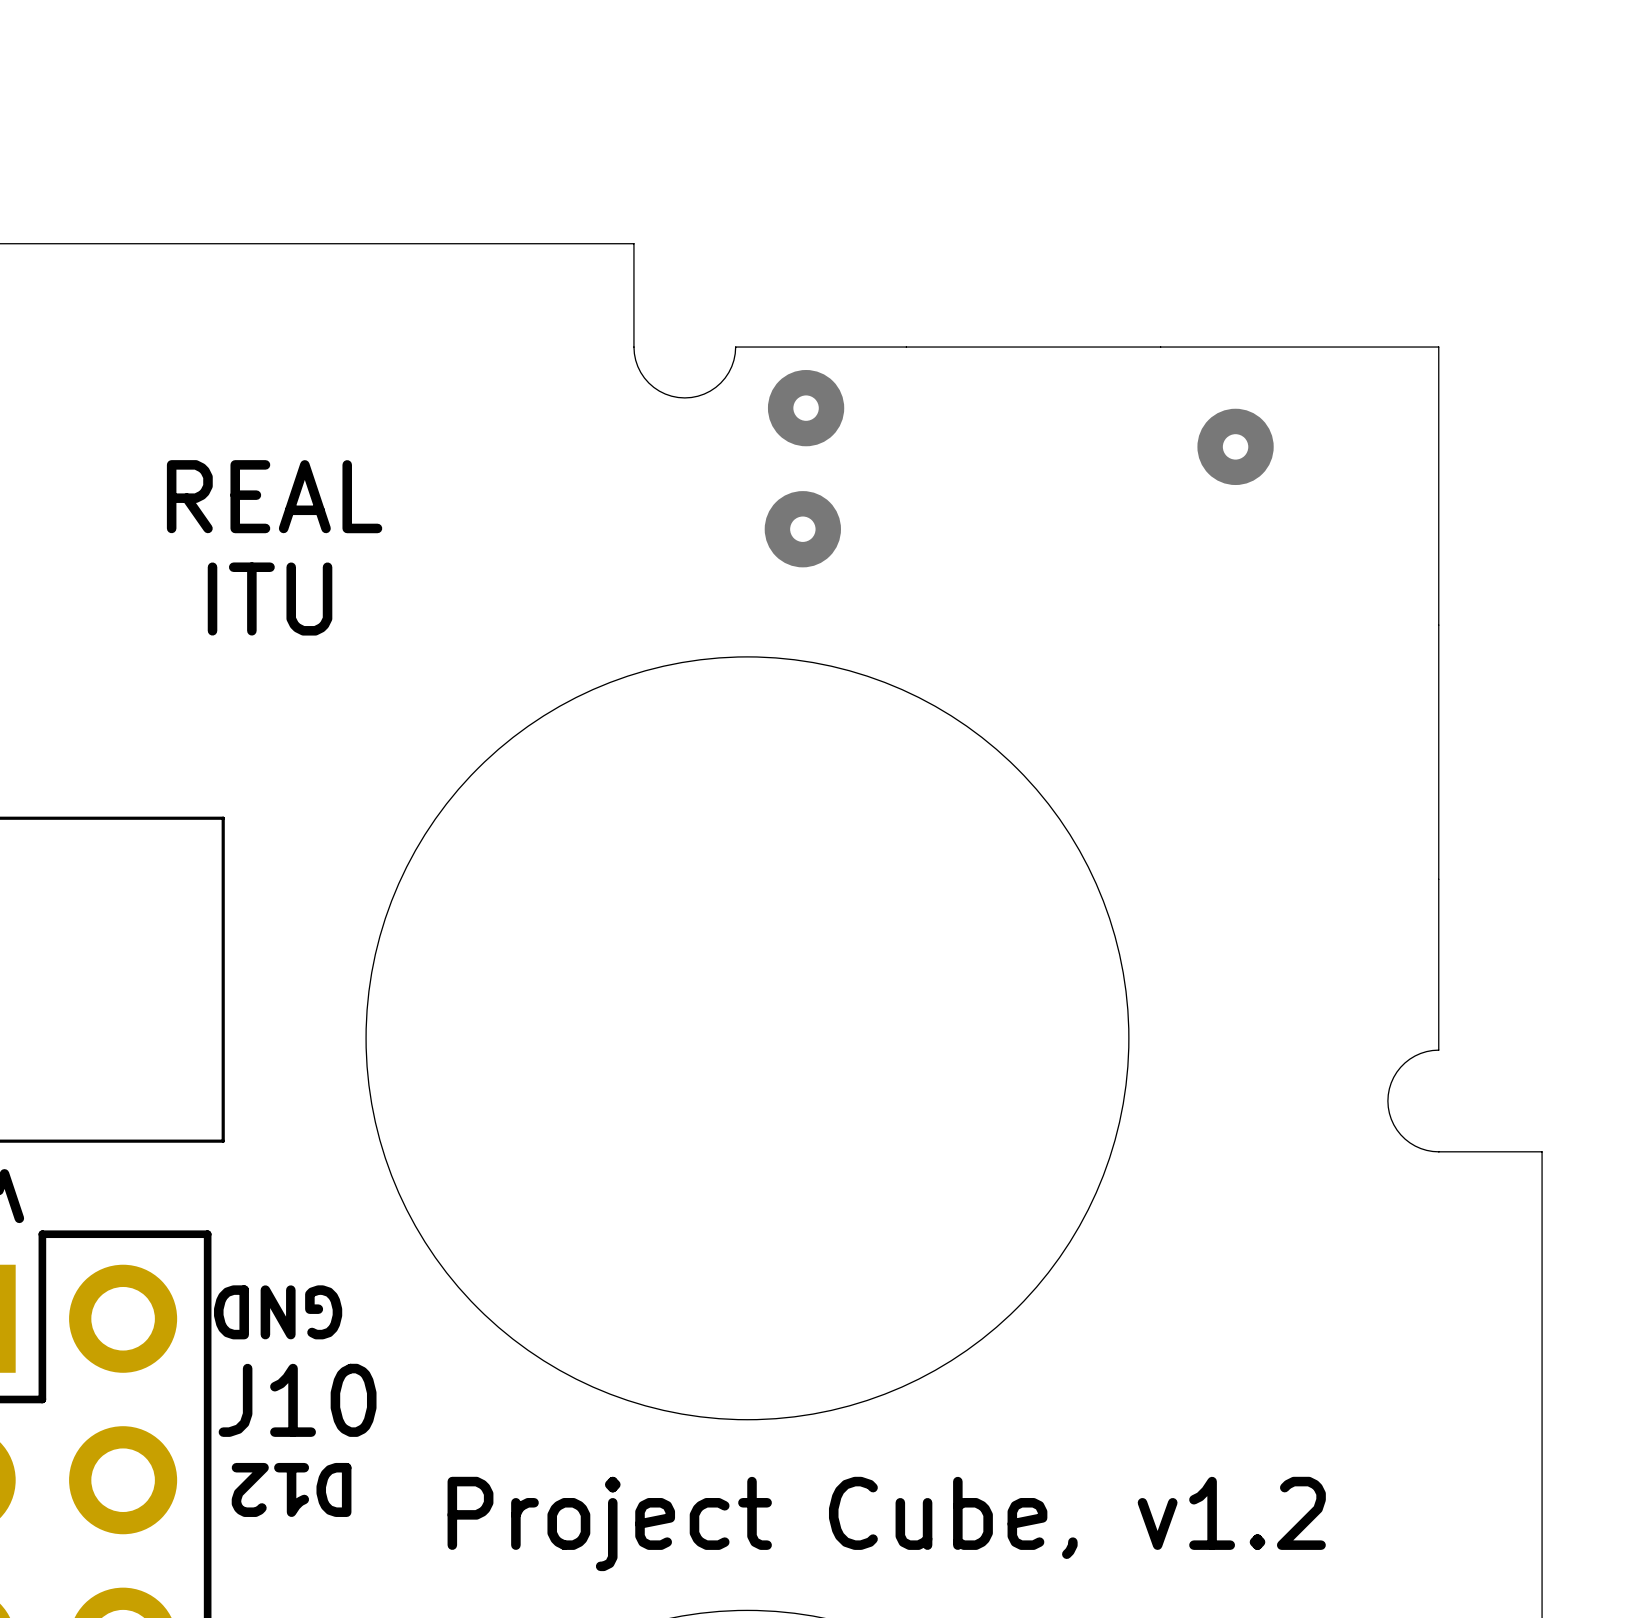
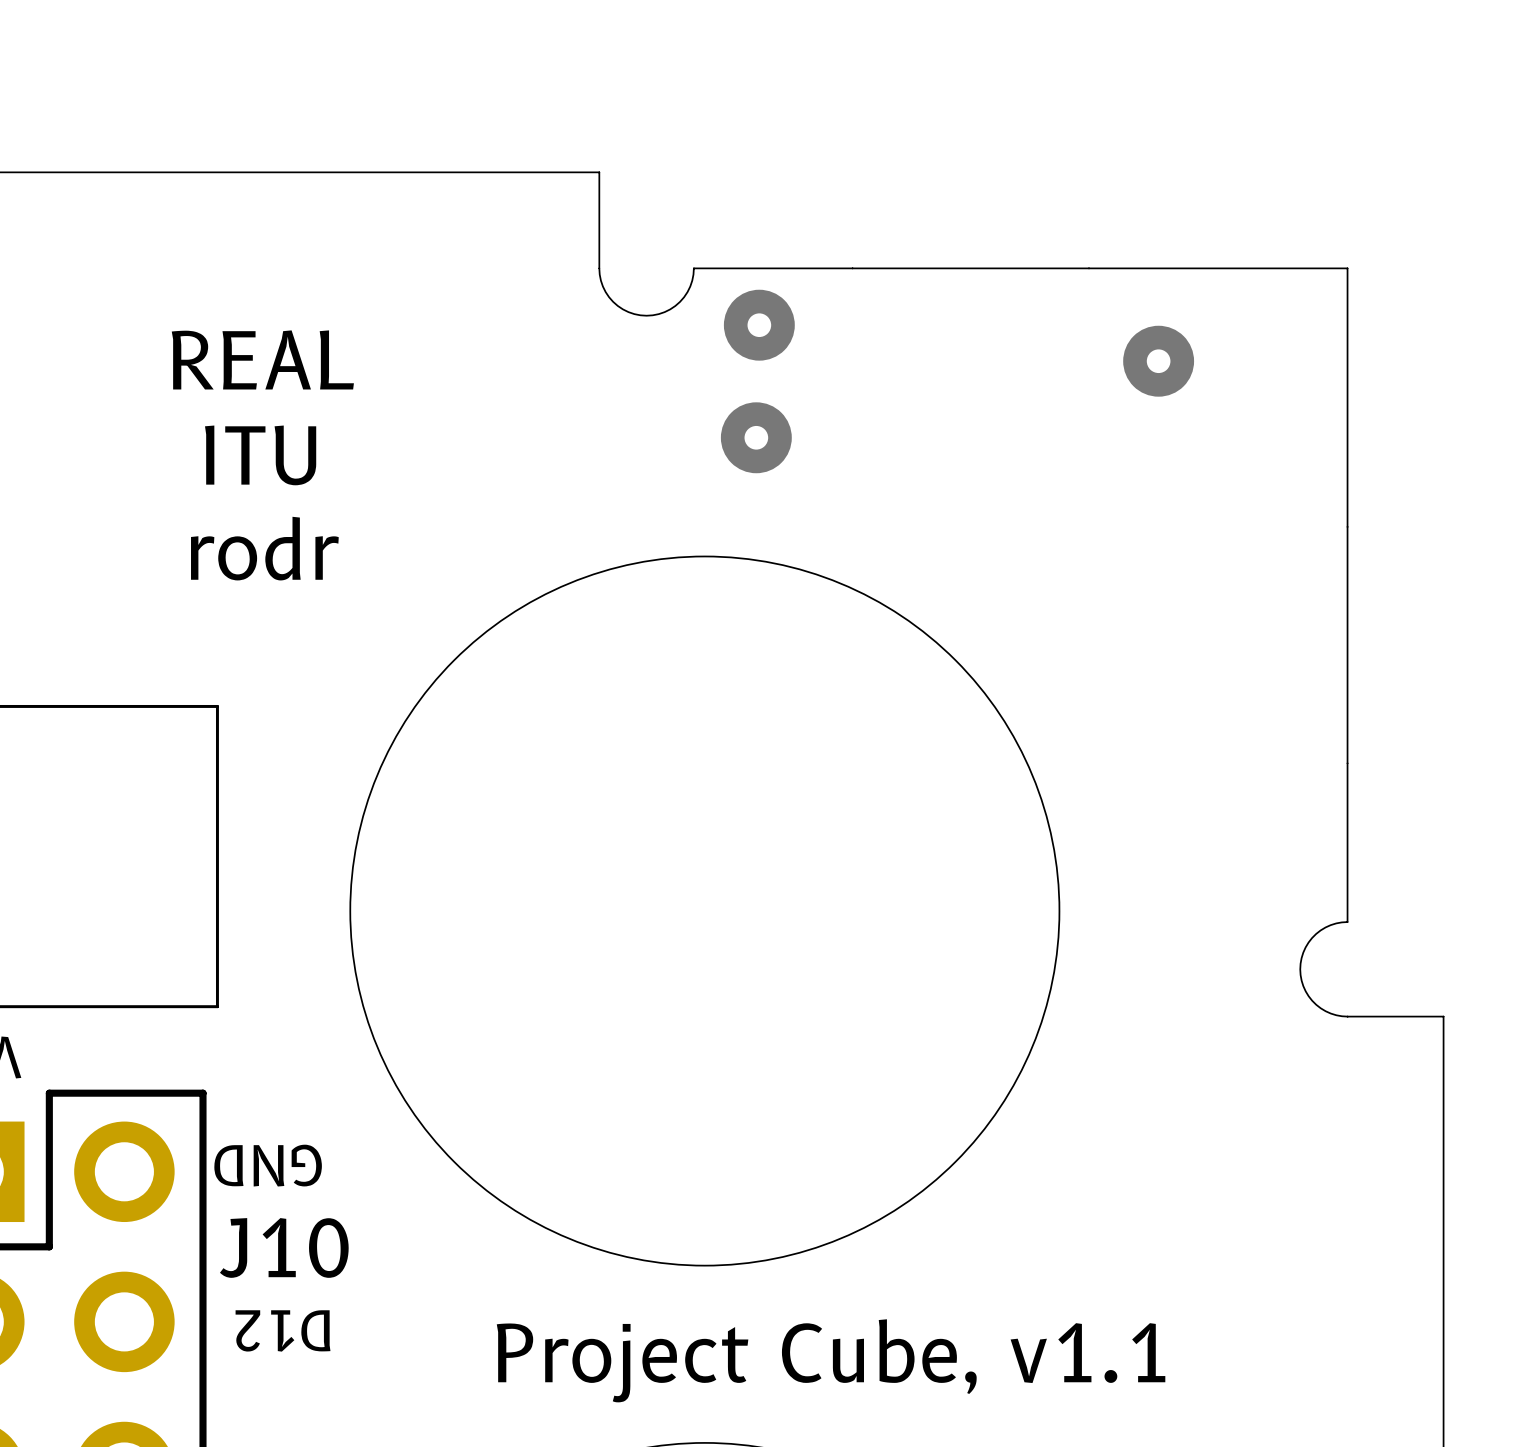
text position: REAL (274, 496) -> REAL (262, 359)
text position: ITU (270, 599) -> ITU (260, 455)
text: none -> rodr (264, 548)
text: Project Cube, v1.2 (886, 1523) -> Project Cube, v1.1 (831, 1360)

